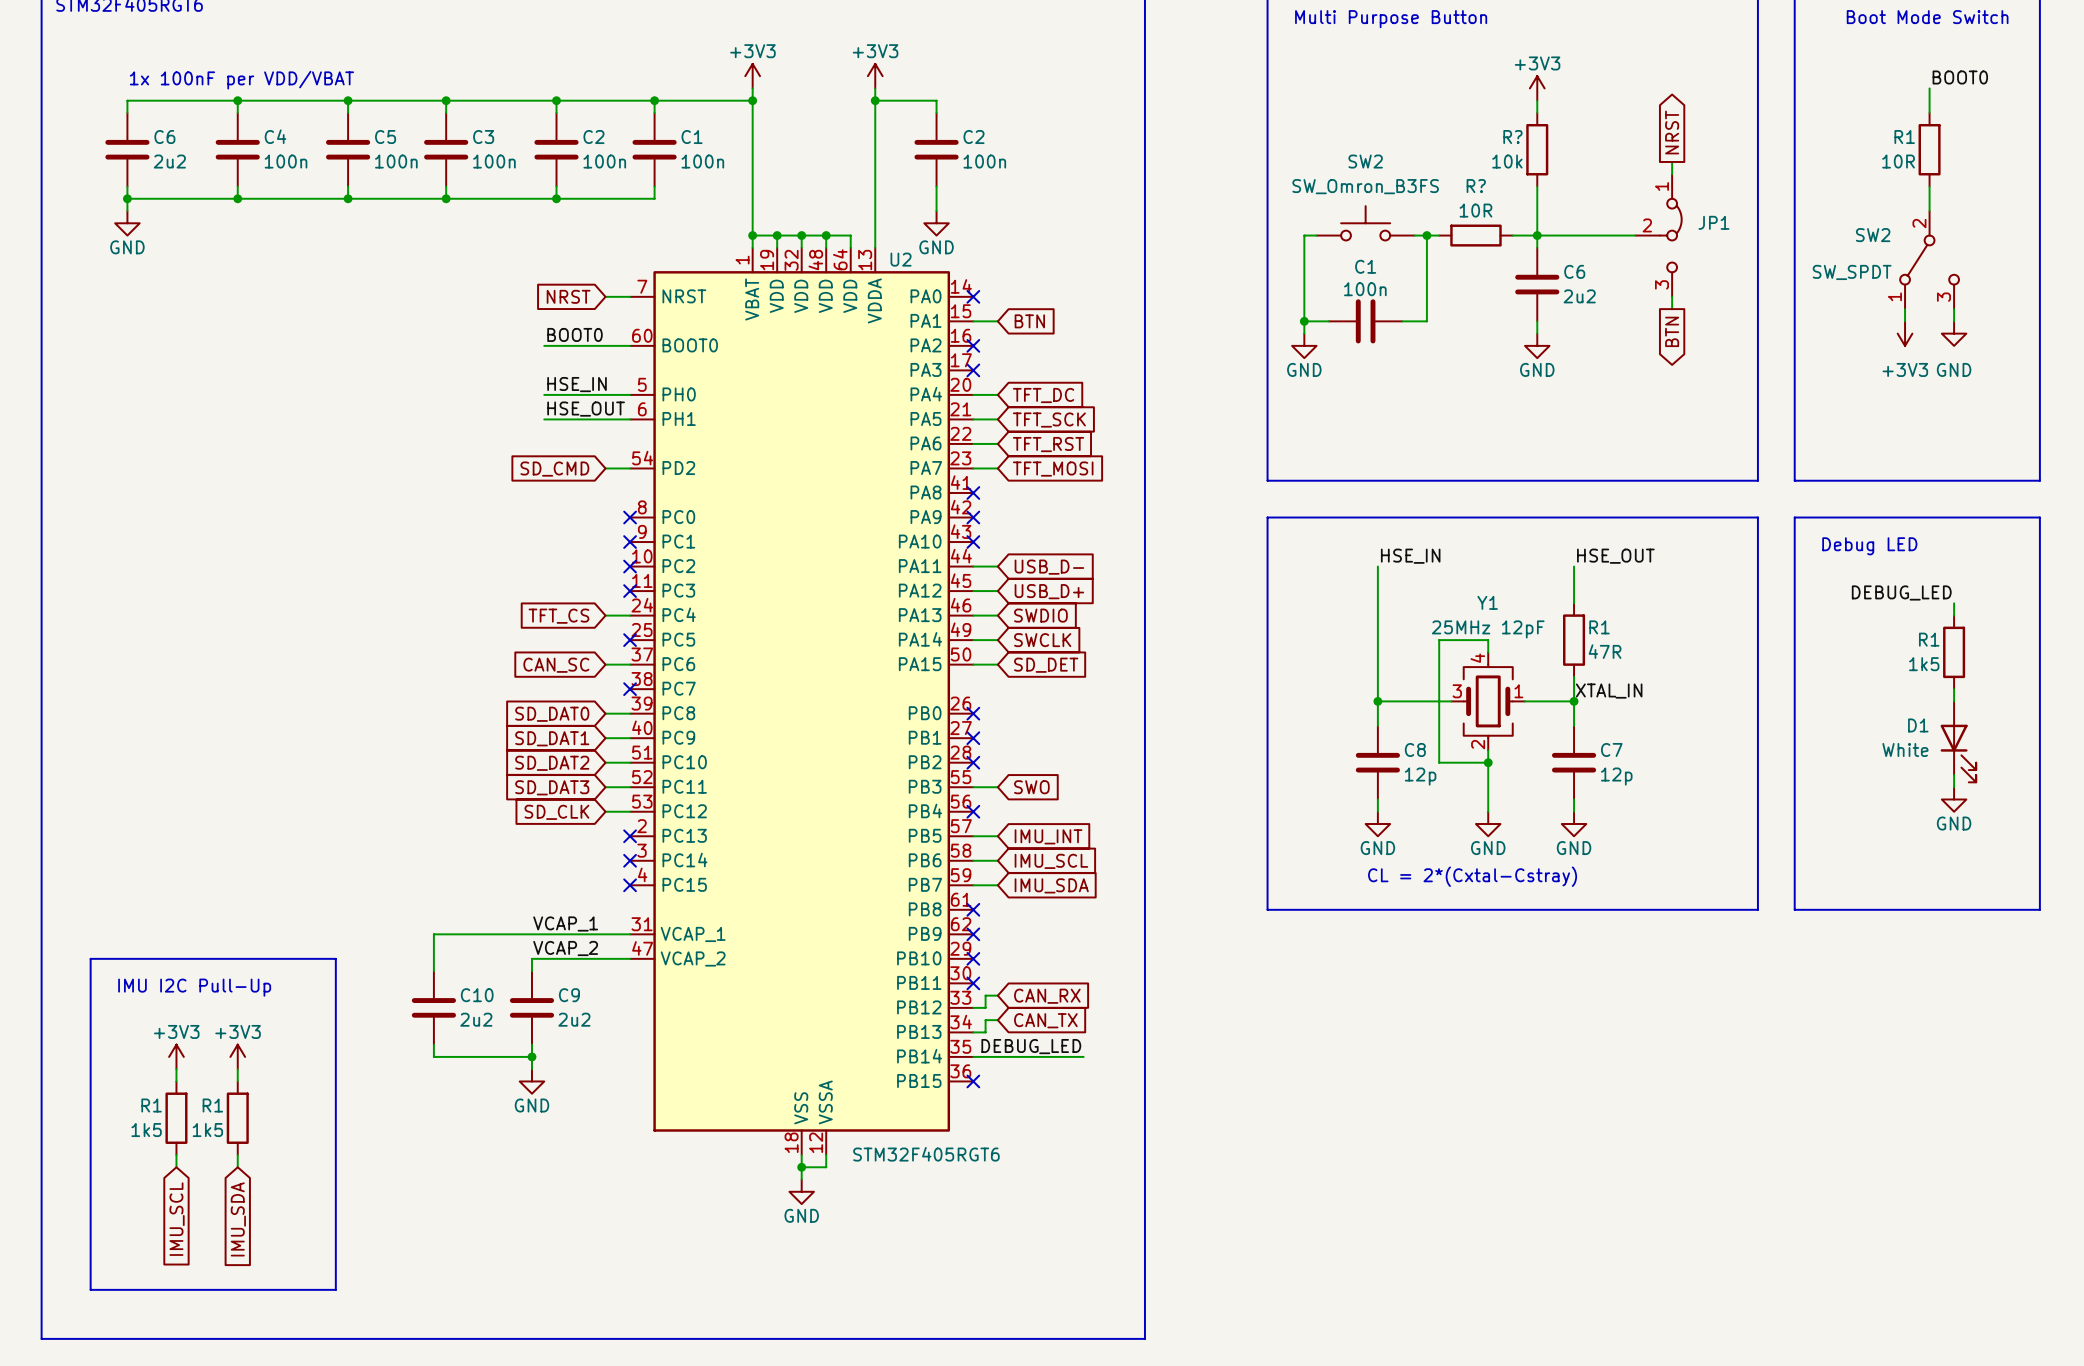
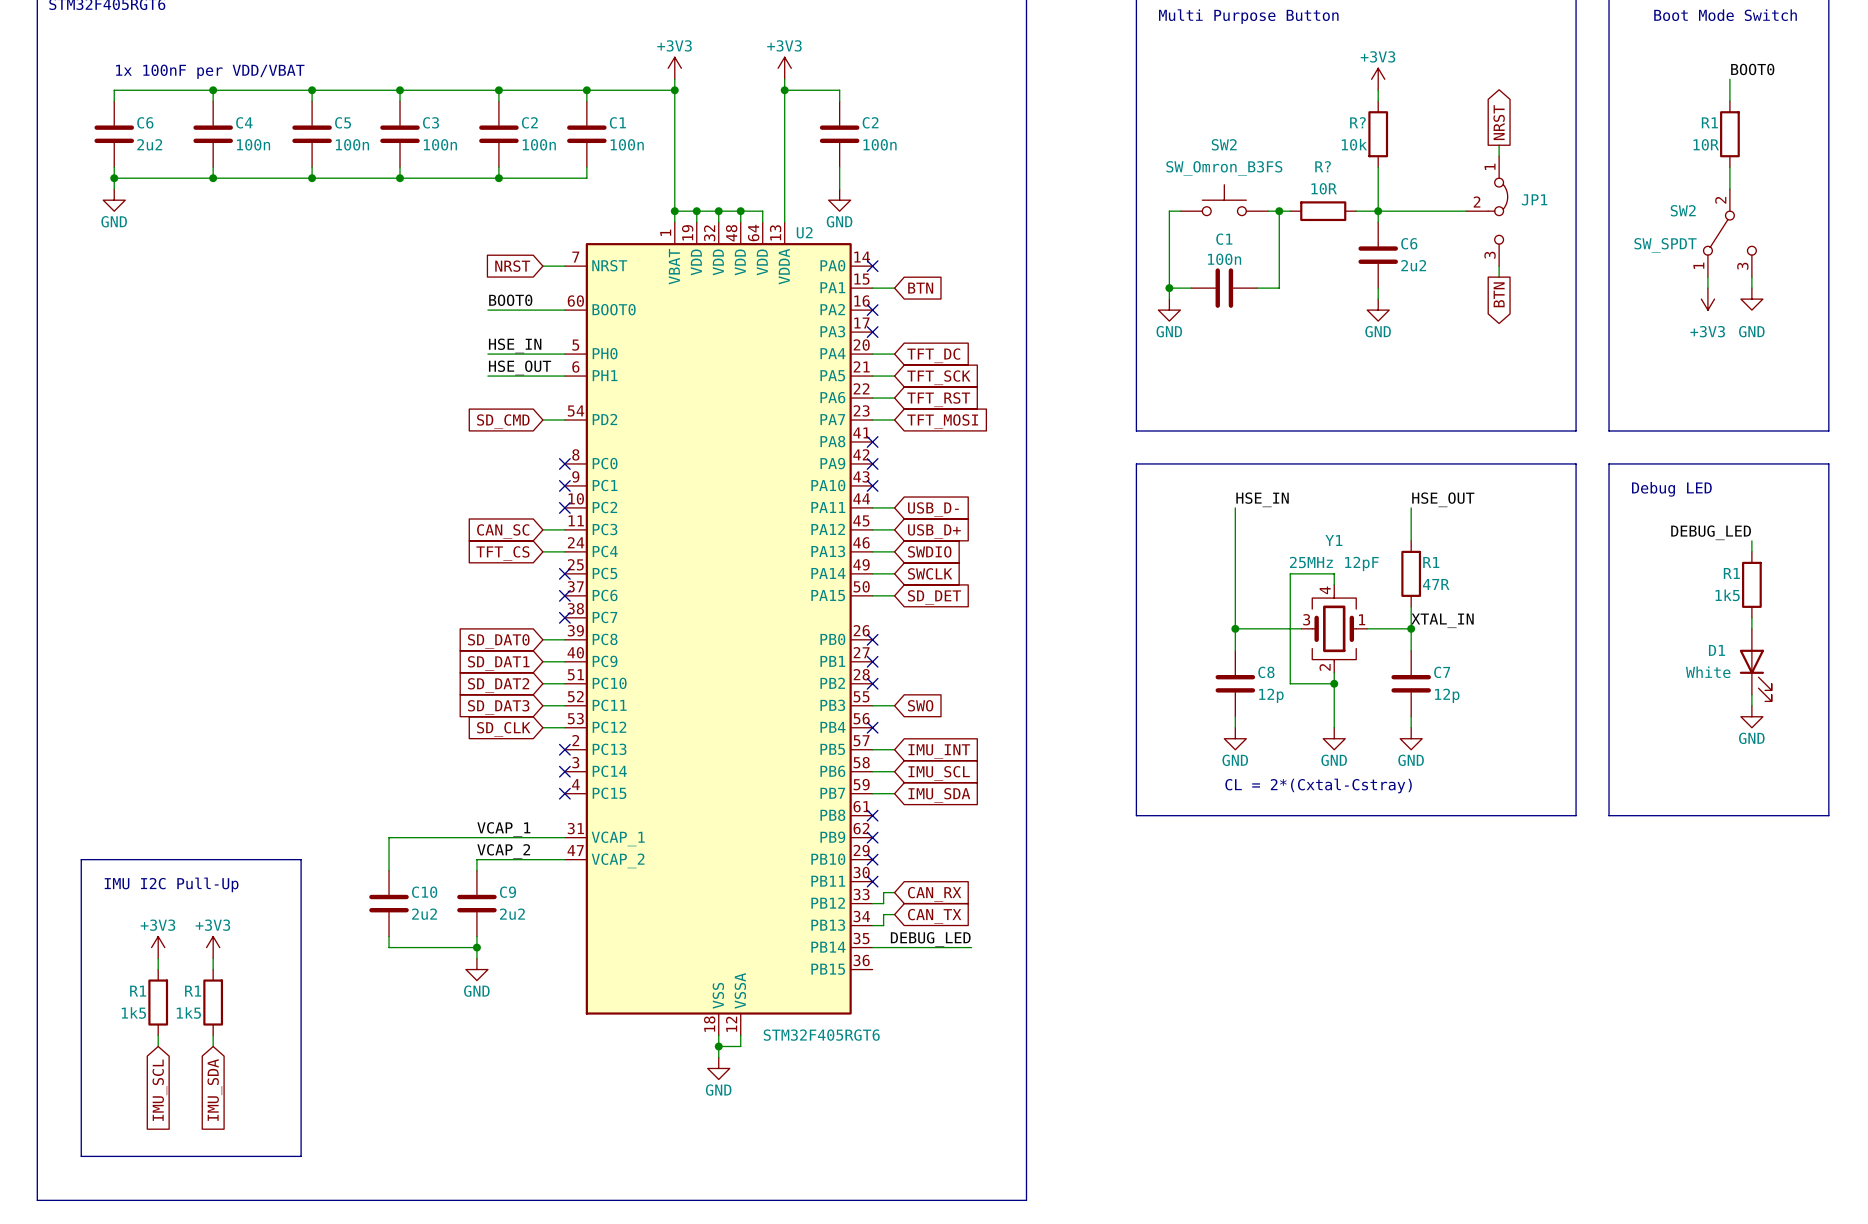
no-connect mark: (630, 591) -> none
wire: (605, 664) (630, 664) -> (542, 529) (564, 529)
no-connect mark: none -> (564, 595)
global label position: CAN_SC (556, 665) -> CAN_SC (503, 531)
no-connect mark: (973, 1081) -> none

